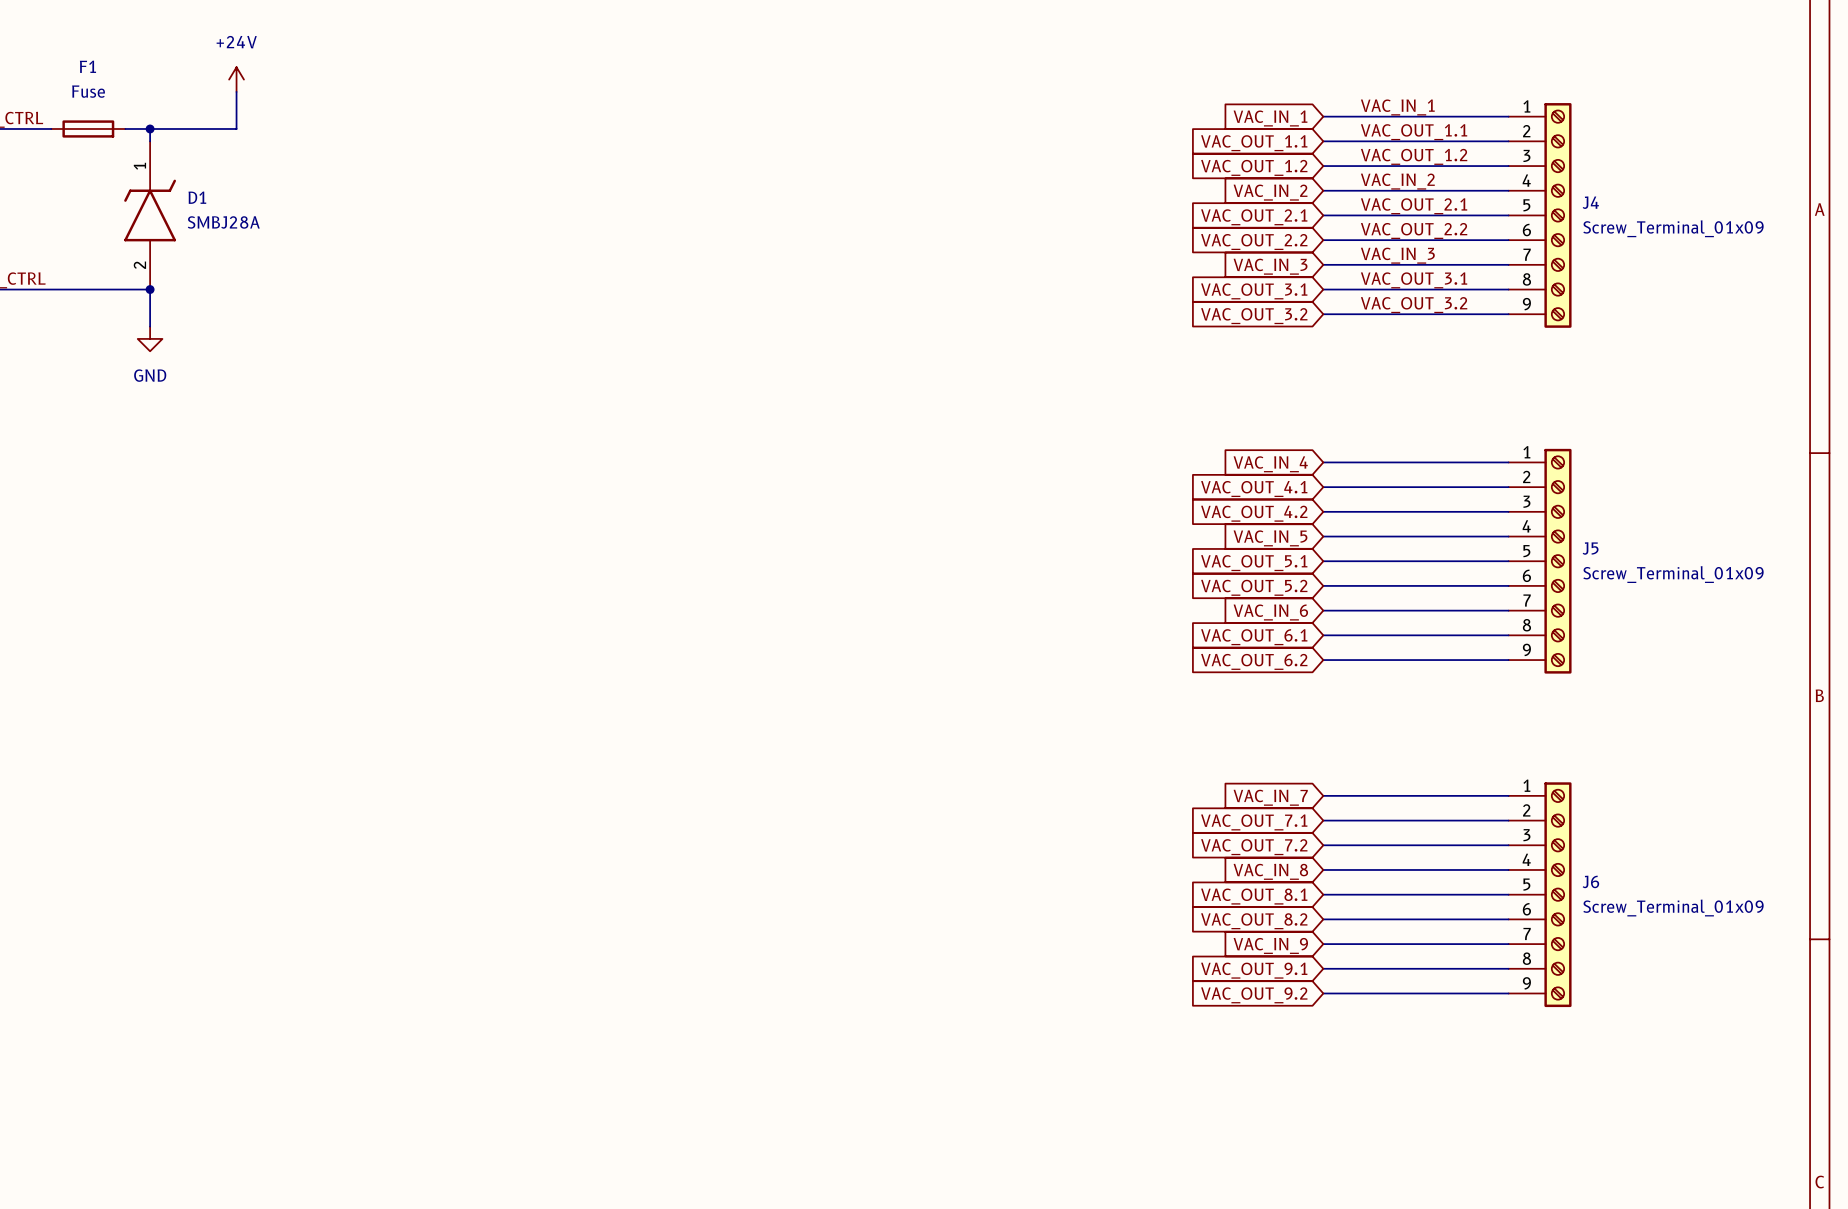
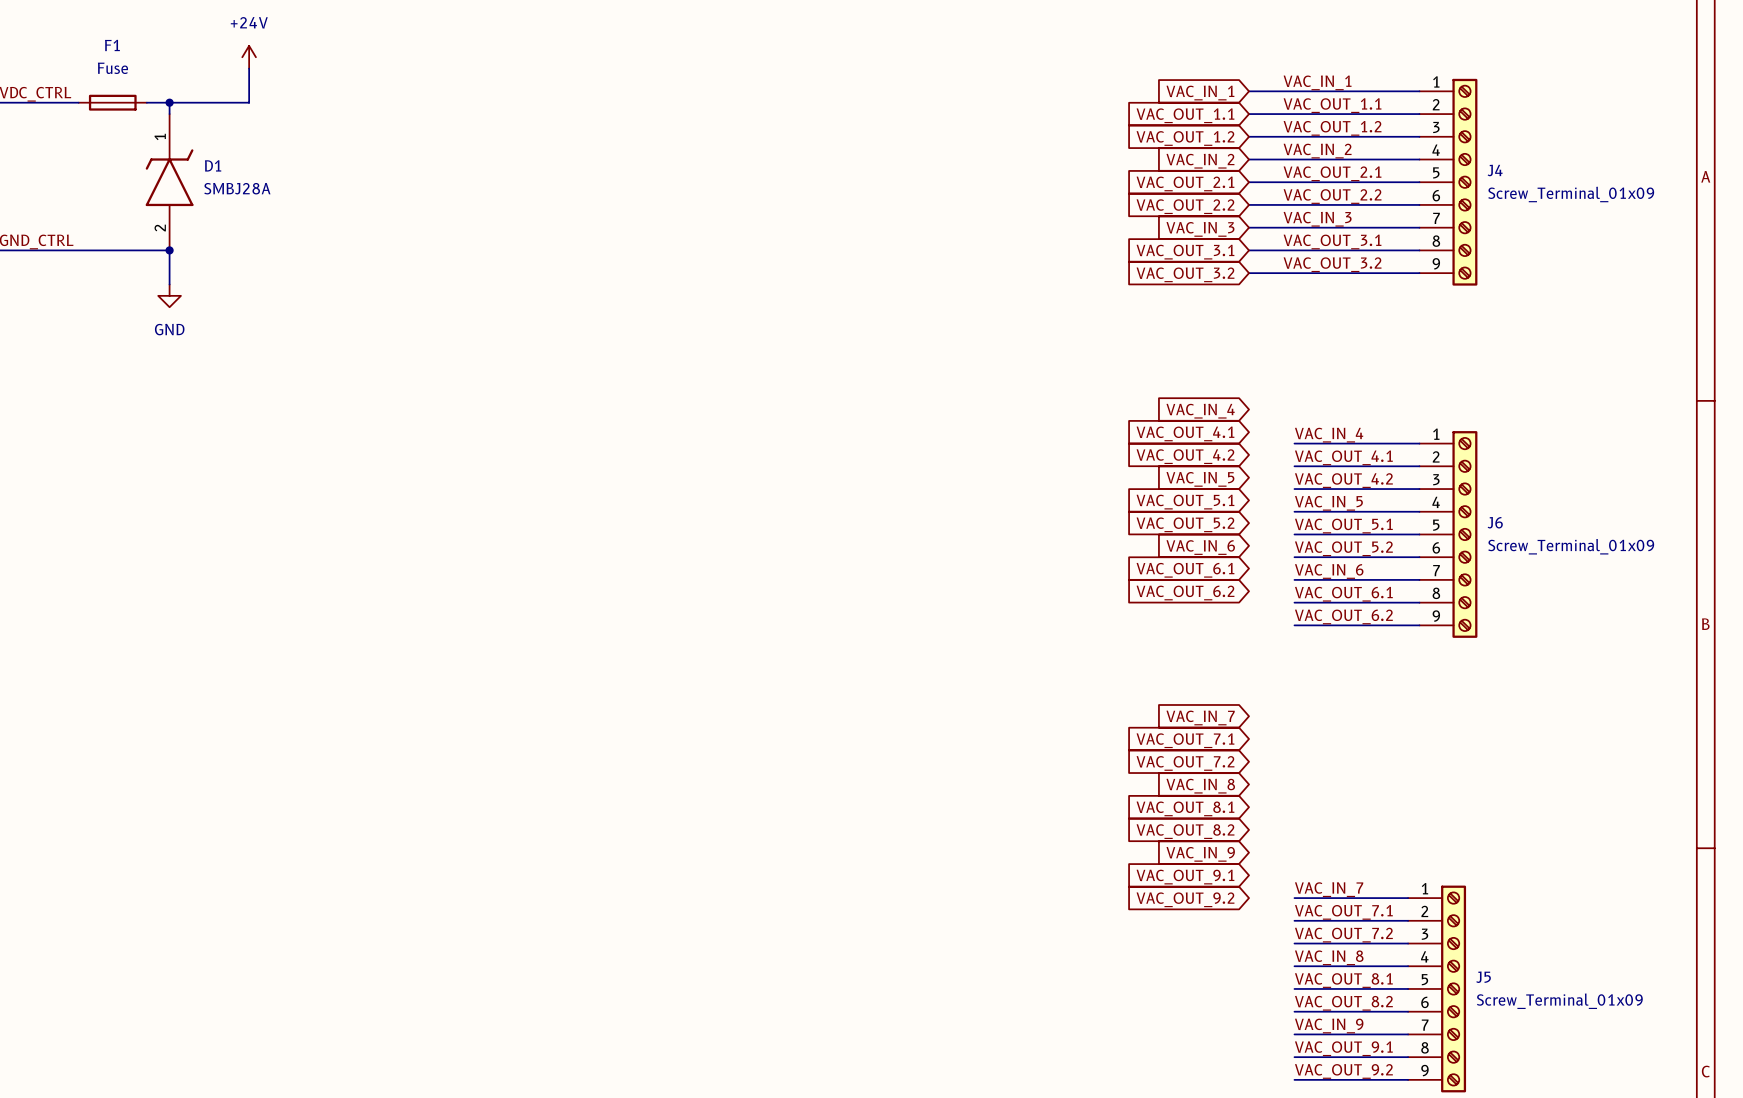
wire: (1323, 462) (1508, 462) -> none
wire: (1323, 487) (1508, 487) -> none
label: none -> VAC_IN_4 (1329, 435)
wire: none -> (1294, 443) (1419, 443)
wire: (1323, 511) (1508, 511) -> none
label: none -> VAC_OUT_4.1 (1343, 457)
wire: none -> (1294, 466) (1419, 466)
wire: (1323, 536) (1508, 536) -> none
label: none -> VAC_OUT_4.2 (1343, 480)
wire: none -> (1294, 489) (1419, 489)
wire: (1323, 561) (1508, 561) -> none
J5 position: (1540, 561) -> (1437, 988)
label: none -> VAC_IN_5 (1328, 503)
wire: none -> (1294, 511) (1419, 511)
wire: (1323, 585) (1508, 585) -> none
label: none -> VAC_OUT_5.1 (1343, 526)
wire: none -> (1294, 534) (1419, 534)
wire: (1323, 610) (1508, 610) -> none
label: none -> VAC_OUT_5.2 (1343, 548)
wire: none -> (1294, 557) (1419, 557)
wire: (1323, 635) (1508, 635) -> none
label: none -> VAC_IN_6 (1329, 571)
wire: none -> (1294, 579) (1419, 579)
wire: (1323, 660) (1508, 660) -> none
label: none -> VAC_OUT_6.1 (1343, 594)
wire: none -> (1294, 602) (1419, 602)
label: none -> VAC_OUT_6.2 (1343, 616)
wire: none -> (1294, 625) (1419, 625)
wire: (1323, 795) (1508, 795) -> none
wire: (1323, 820) (1508, 820) -> none
wire: (1323, 845) (1508, 845) -> none
wire: (1323, 869) (1508, 869) -> none
wire: (1323, 894) (1508, 894) -> none
J6 position: (1540, 894) -> (1448, 534)
wire: (1323, 919) (1508, 919) -> none
wire: (1323, 944) (1508, 944) -> none
wire: (1323, 968) (1508, 968) -> none
label: none -> VAC_IN_7 (1329, 889)
wire: (1323, 993) (1372, 993) -> none
label: none -> VAC_OUT_7.1 (1343, 912)
wire: none -> (1294, 920) (1408, 920)
label: none -> VAC_OUT_7.2 (1343, 935)
wire: none -> (1294, 943) (1408, 943)
label: none -> VAC_IN_8 (1329, 957)
wire: none -> (1294, 966) (1408, 966)
label: none -> VAC_OUT_8.1 (1343, 980)
wire: none -> (1294, 988) (1408, 988)
label: none -> VAC_OUT_8.2 (1343, 1003)
wire: none -> (1294, 1011) (1408, 1011)
label: none -> VAC_IN_9 (1329, 1025)
wire: none -> (1294, 1034) (1408, 1034)
label: none -> VAC_OUT_9.1 (1343, 1048)
wire: none -> (1294, 1057) (1408, 1057)
label: none -> VAC_OUT_9.2 (1343, 1071)
wire: none -> (1294, 1079) (1408, 1079)

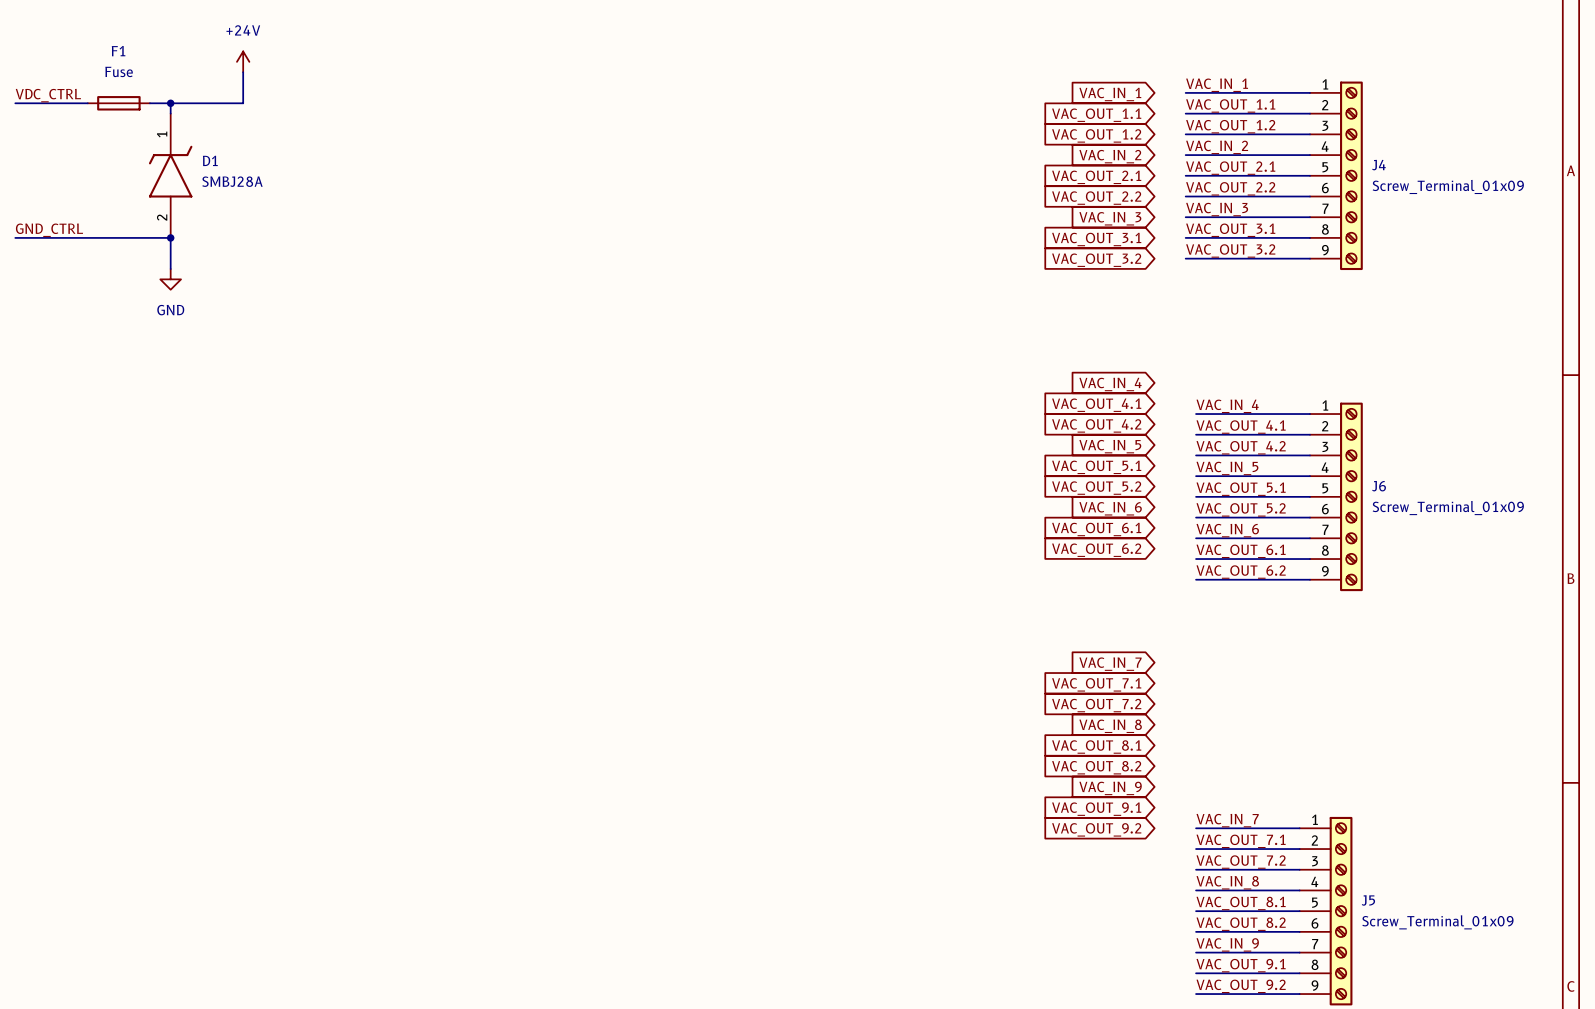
wire: (1249, 91) (1283, 91) -> none
wire: (1249, 114) (1283, 114) -> none
wire: (1249, 136) (1283, 136) -> none
wire: (1249, 159) (1283, 159) -> none
wire: (1249, 182) (1283, 182) -> none
wire: (1249, 204) (1283, 204) -> none
wire: (1249, 227) (1283, 227) -> none
wire: (1249, 250) (1283, 250) -> none
wire: (1249, 273) (1283, 273) -> none

